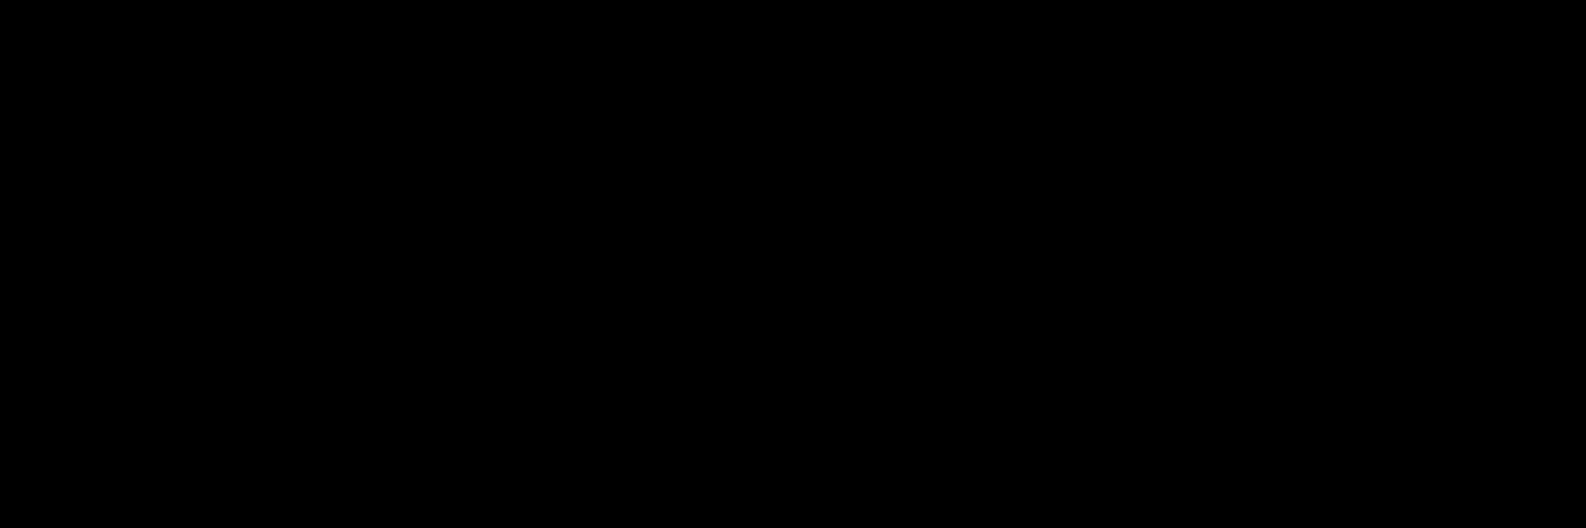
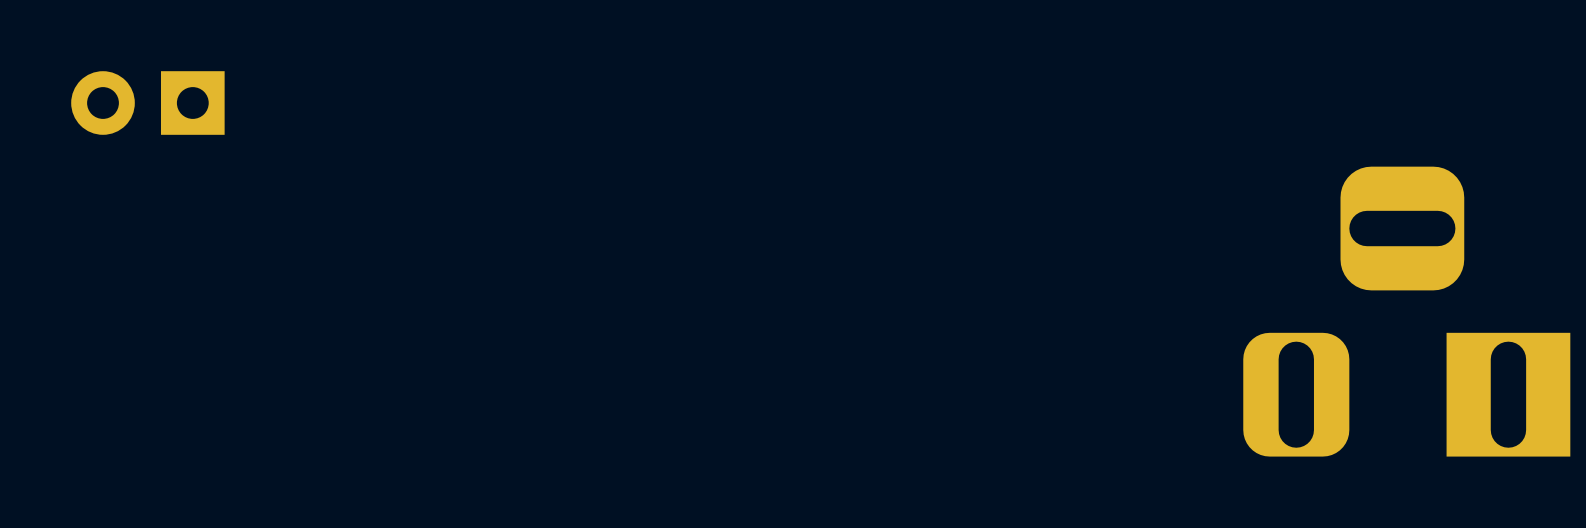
part: none -> (147, 103)
part: none -> (1406, 311)

